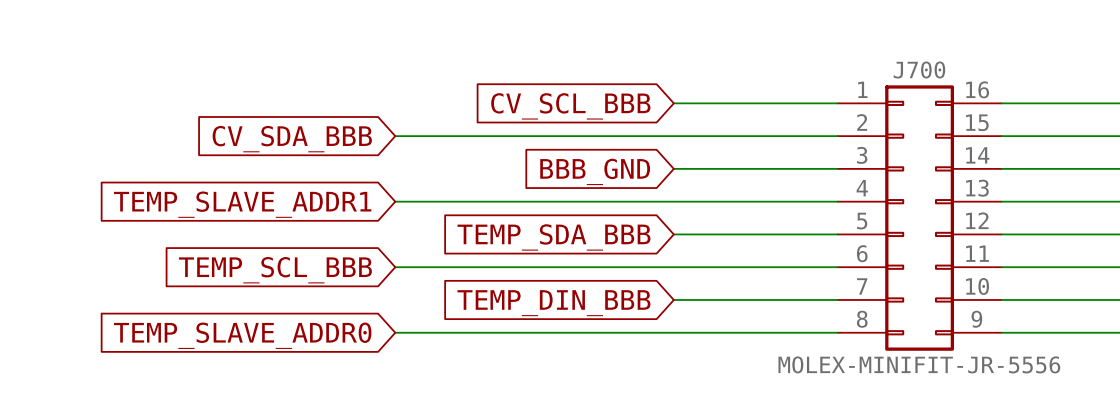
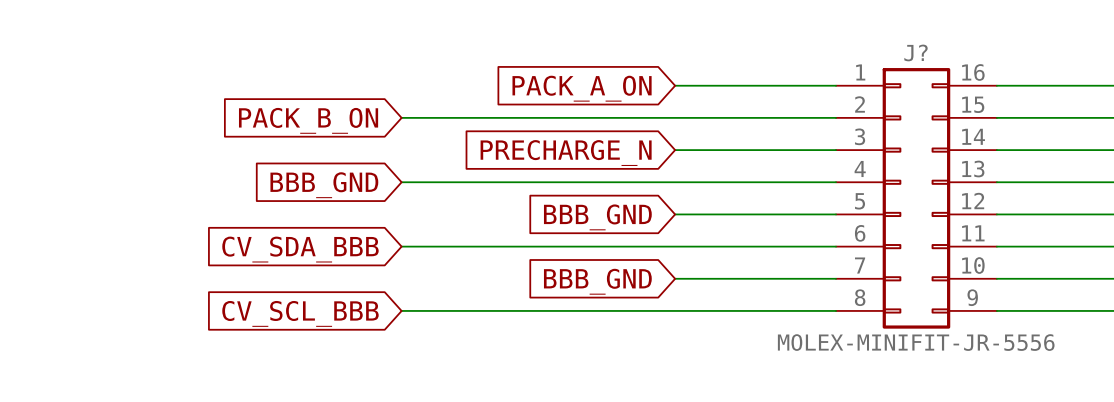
J700 name: J700 (919, 69) -> J? (916, 52)
global label: CV_SCL_BBB (570, 106) -> PACK_A_ON (582, 88)
global label: CV_SDA_BBB (292, 139) -> PACK_B_ON (308, 120)
global label: BBB_GND (595, 171) -> PRECHARGE_N (566, 153)
global label: TEMP_SLAVE_ADDR1 (242, 204) -> BBB_GND (324, 185)
global label: TEMP_SDA_BBB (553, 237) -> BBB_GND (597, 217)
global label: TEMP_SCL_BBB (275, 270) -> CV_SDA_BBB (300, 249)
global label: TEMP_DIN_BBB (553, 303) -> BBB_GND (597, 281)
global label: TEMP_SLAVE_ADDR0 (242, 335) -> CV_SCL_BBB (300, 313)

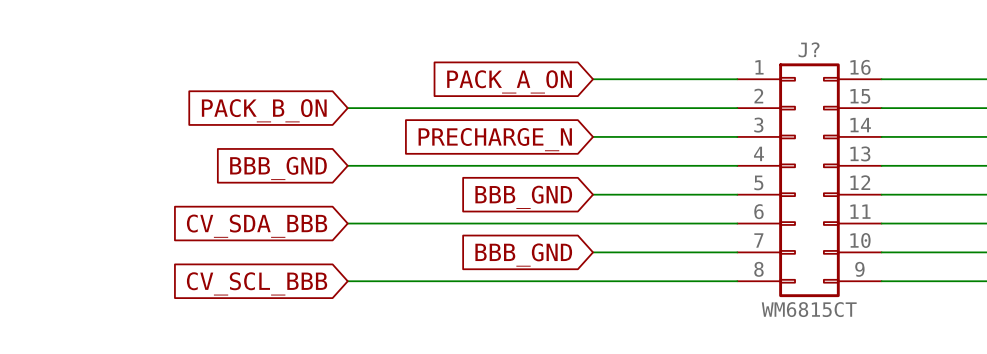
J? value: MOLEX-MINIFIT-JR-5556 (916, 342) -> WM6815CT (809, 309)

